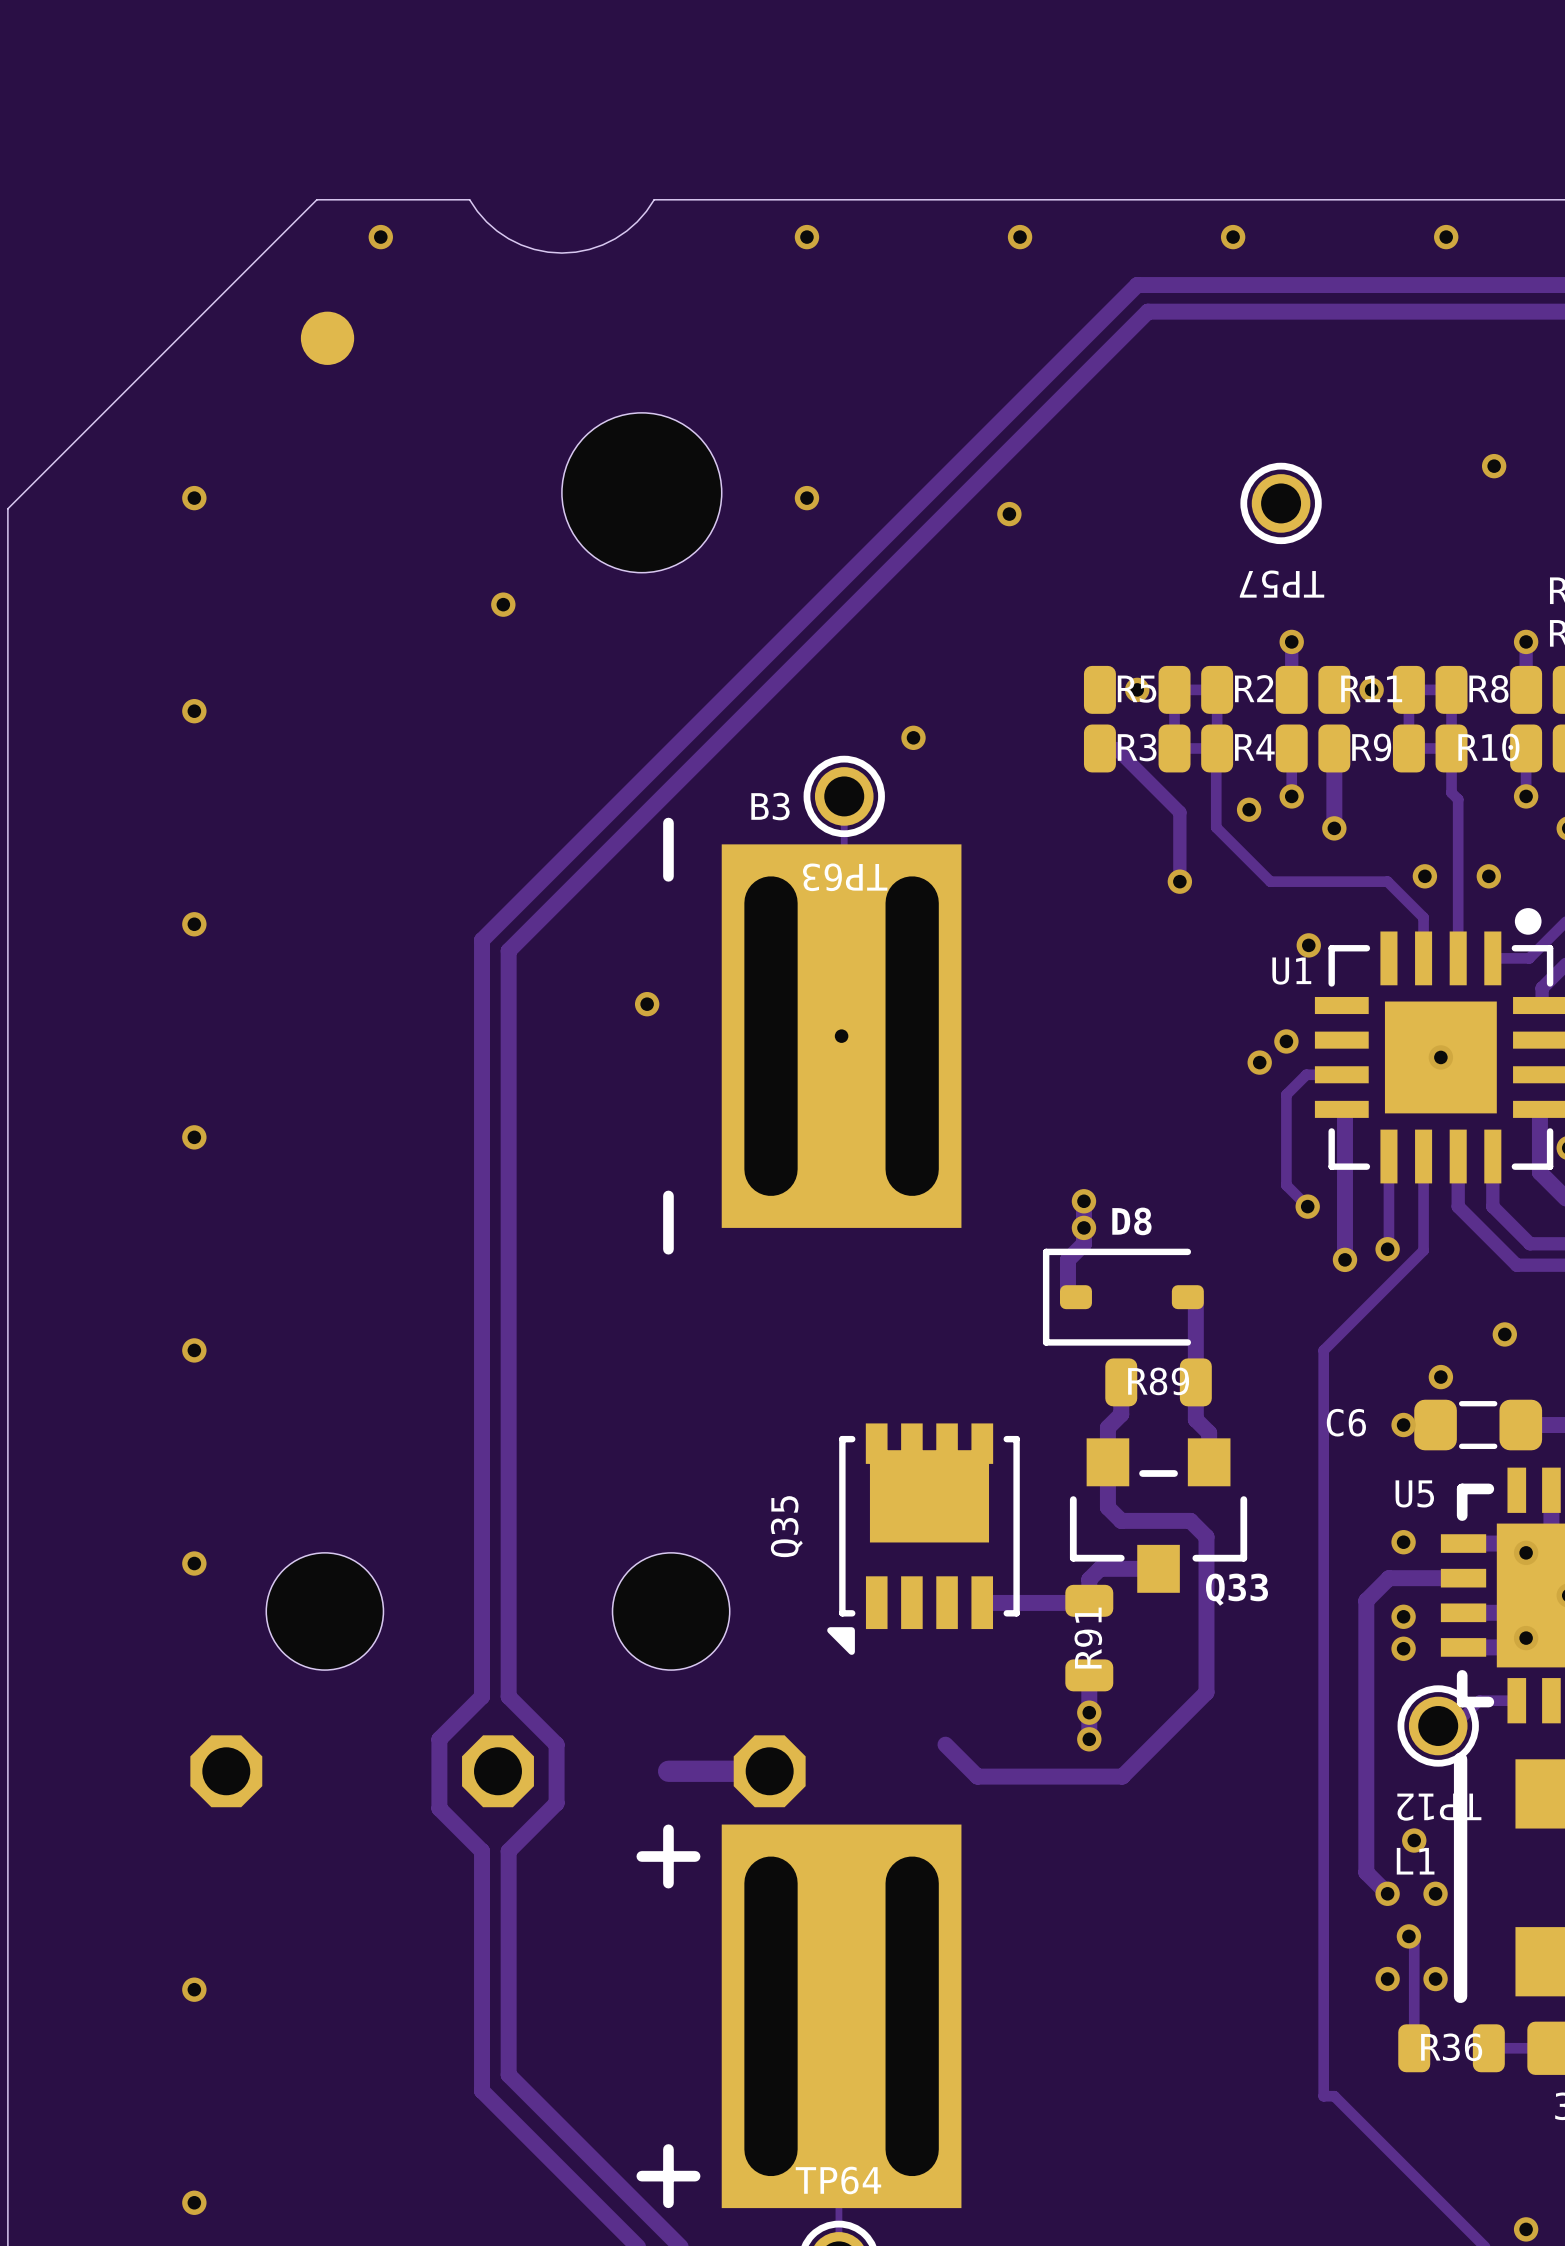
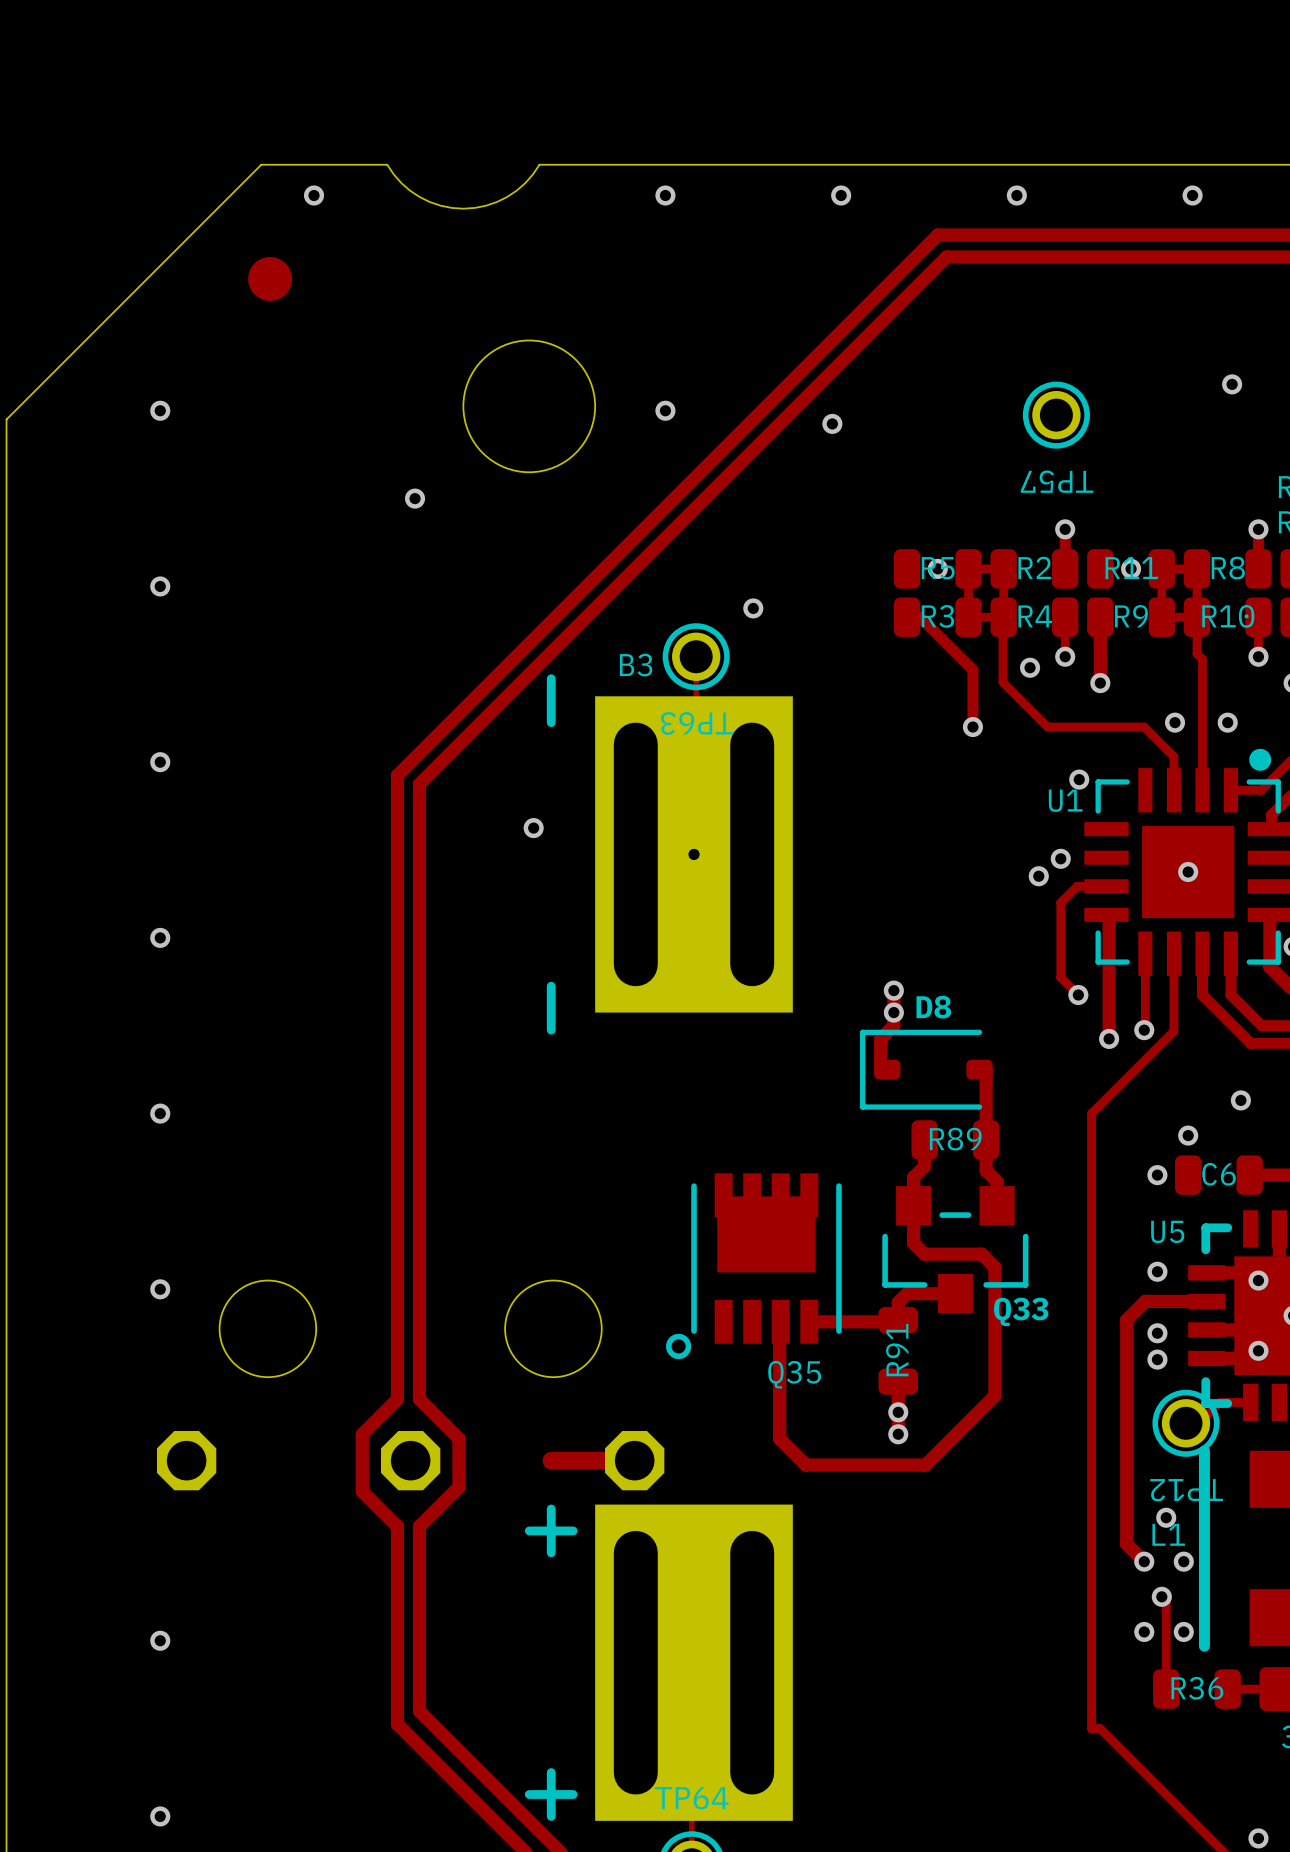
C6 footprint: [1414, 1399, 1543, 1451] -> [1175, 1155, 1263, 1195]
C6 name position: C6 (1346, 1422) -> C6 (1219, 1174)
Q35 footprint: [827, 1423, 1020, 1655] -> [666, 1173, 842, 1360]
Q35 name rotation: 0° (786, 1526) -> 90° clockwise (794, 1374)
Q35 name position: Q35 (786, 1526) -> Q35 (794, 1374)
track: none -> (779, 1322) (779, 1438)

